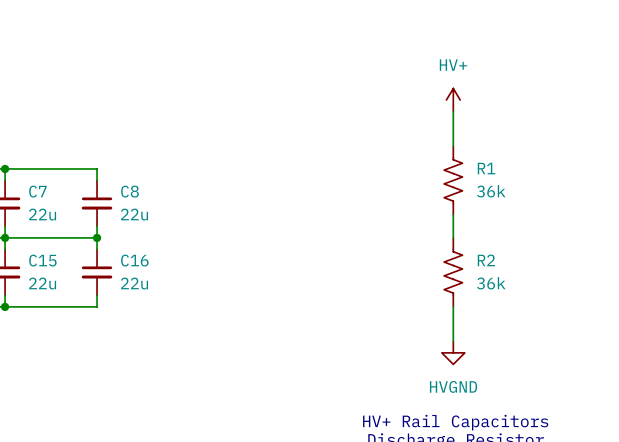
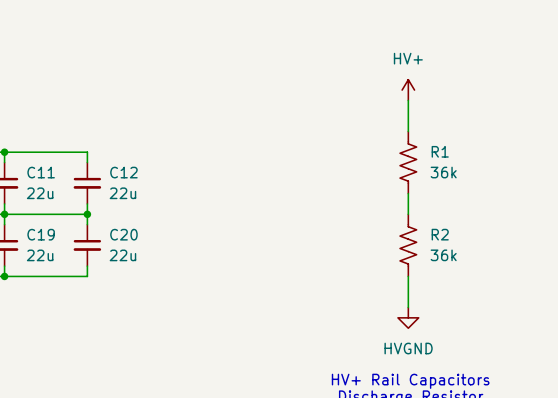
C7 name: C7 (37, 191) -> C11 (41, 172)
C8 name: C8 (130, 191) -> C12 (123, 172)
C15 name: C15 (42, 260) -> C19 (41, 234)
C16 name: C16 (134, 260) -> C20 (123, 234)

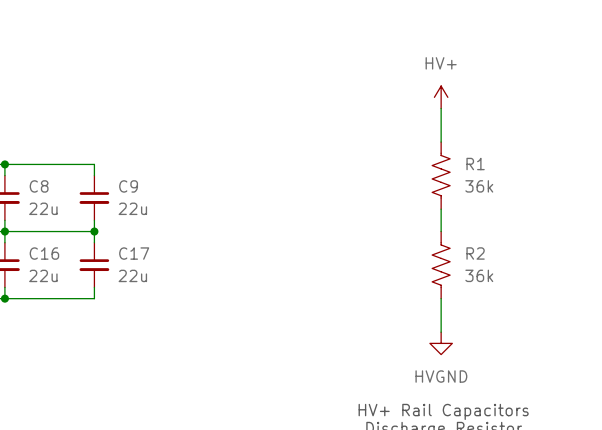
C11 name: C11 (41, 172) -> C8 (39, 186)
C12 name: C12 (123, 172) -> C9 (128, 186)
C19 name: C19 (41, 234) -> C16 (44, 253)
C20 name: C20 (123, 234) -> C17 (134, 253)

